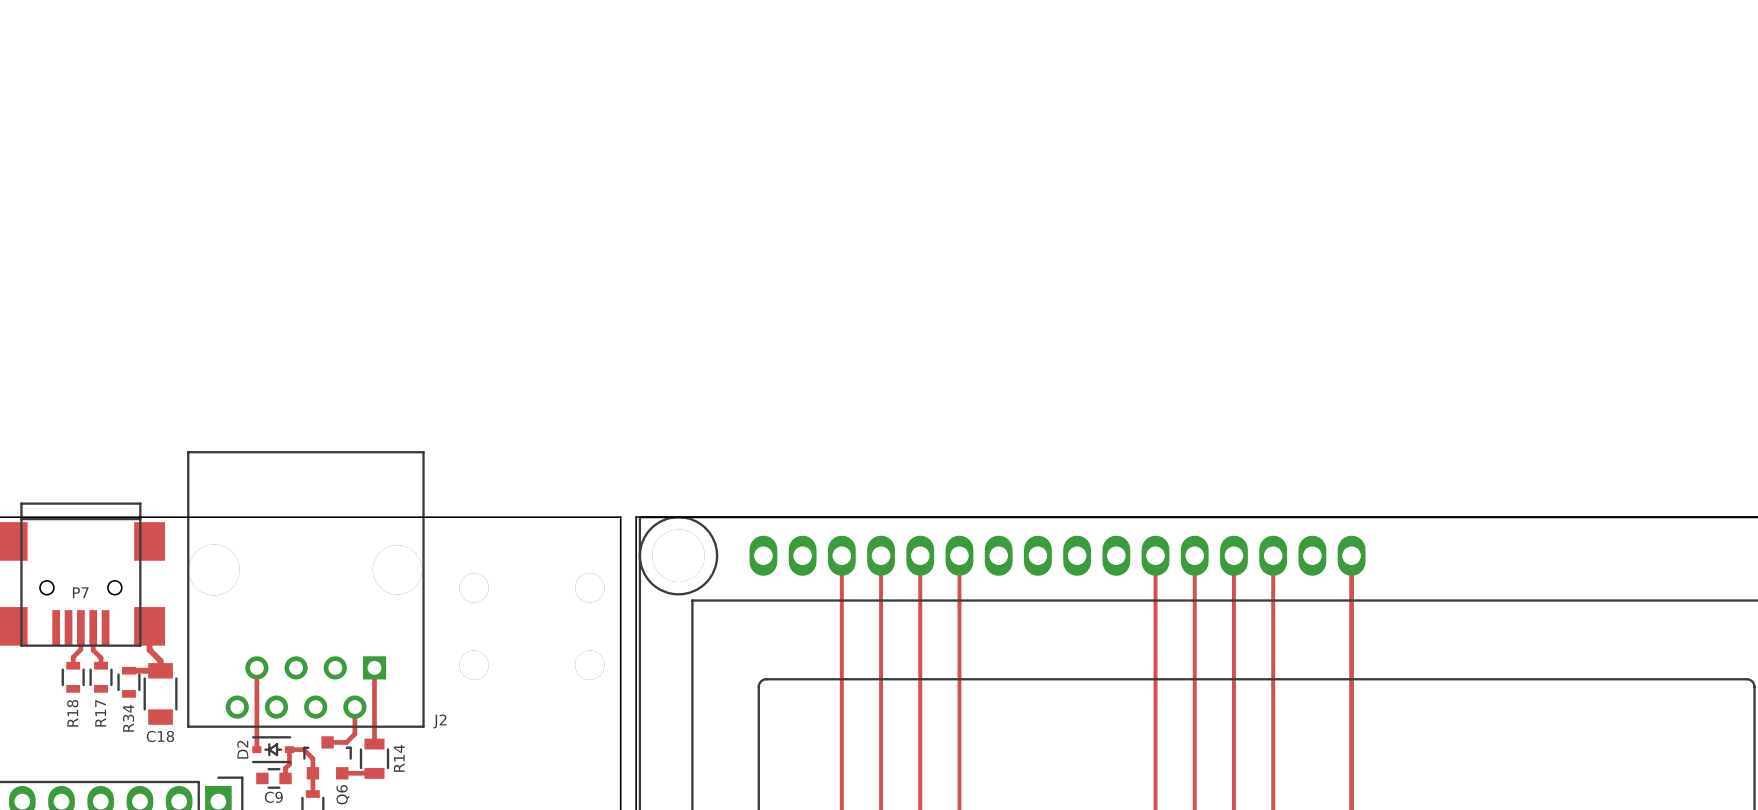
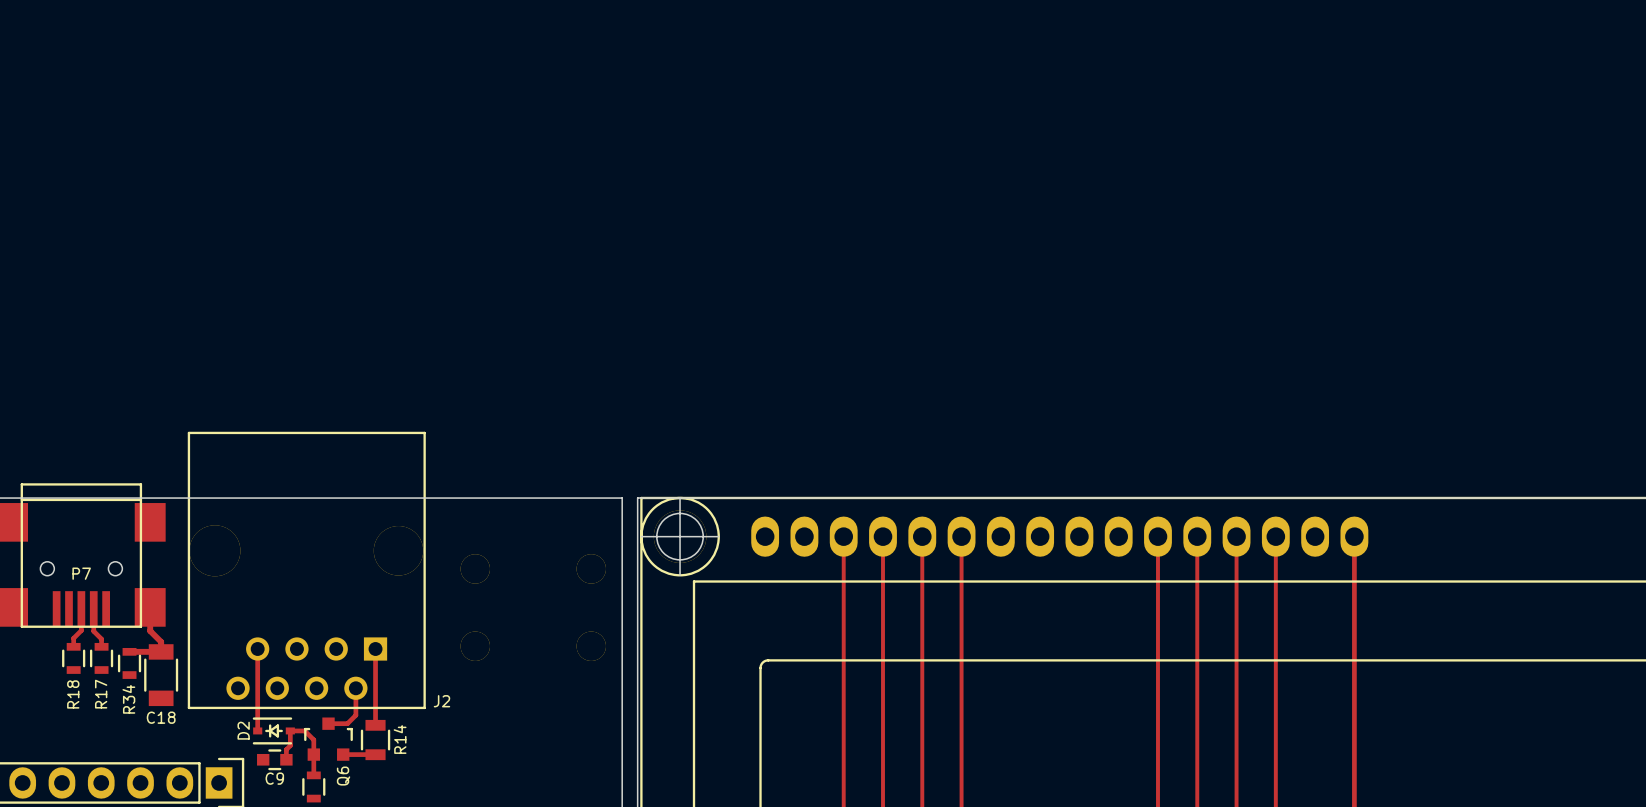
board edge: none -> (680, 497) (680, 575)
round board edge: none -> [656, 512, 705, 561]
board edge: none -> (641, 536) (718, 536)

